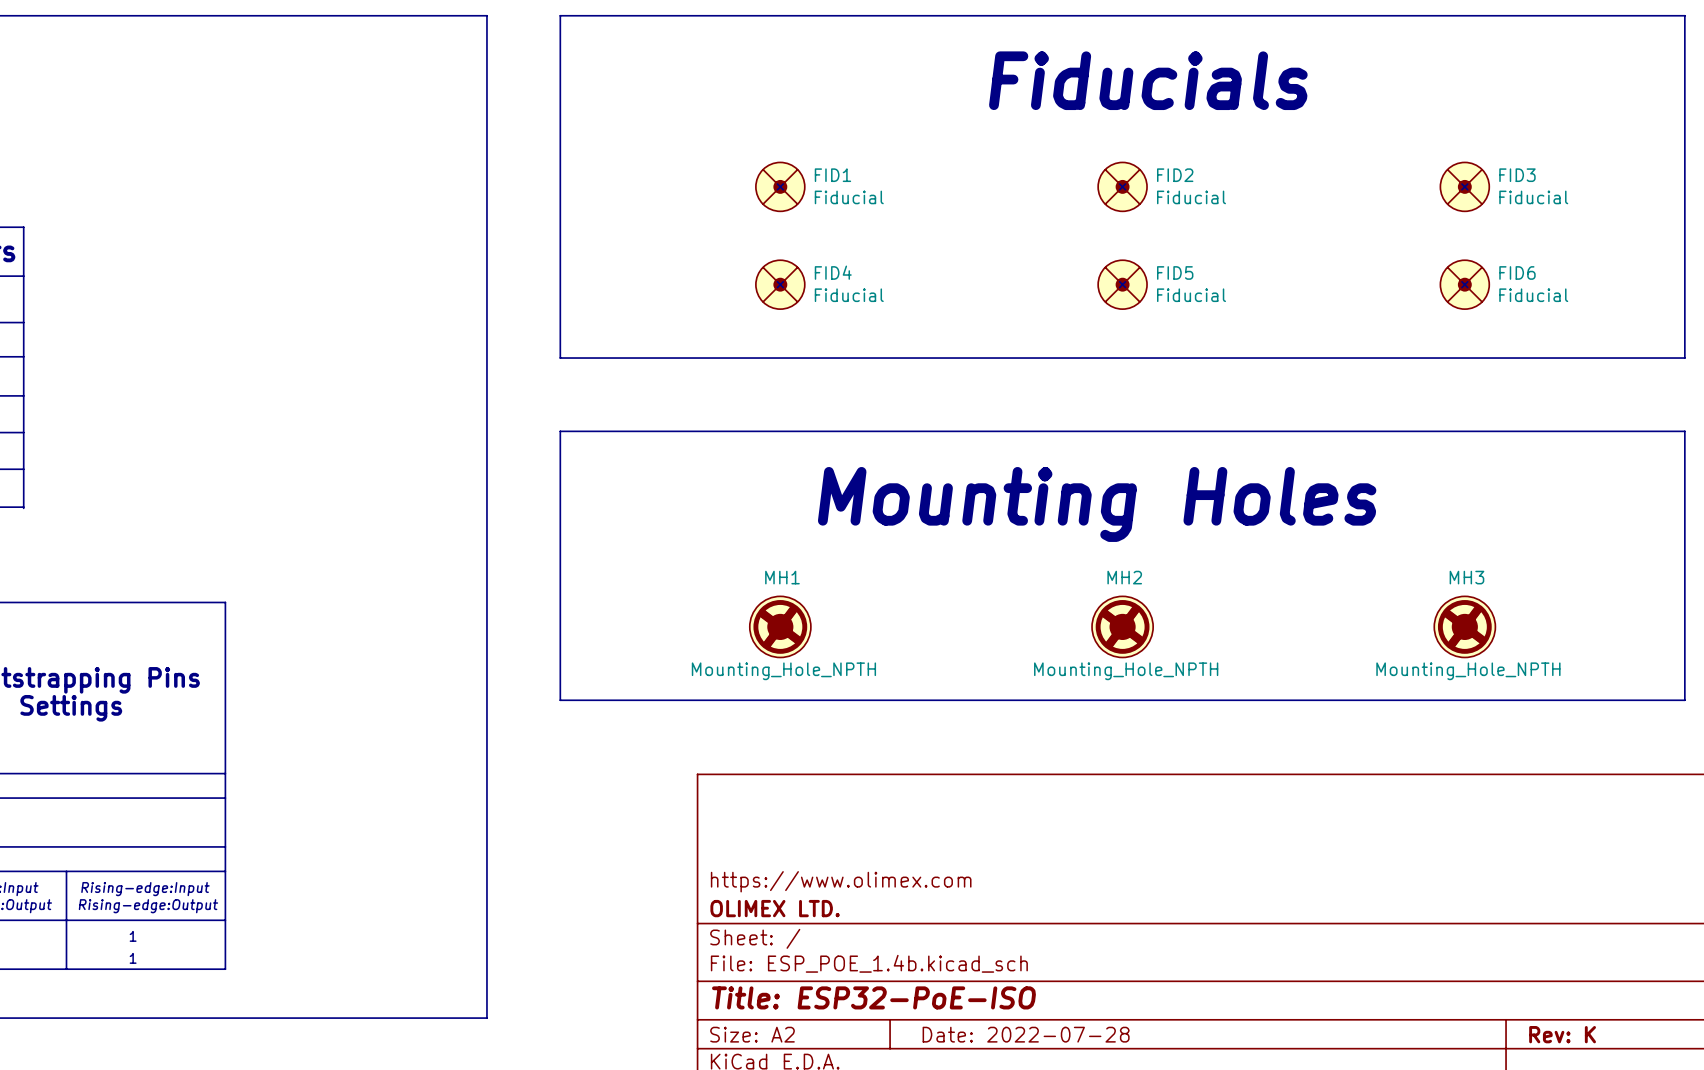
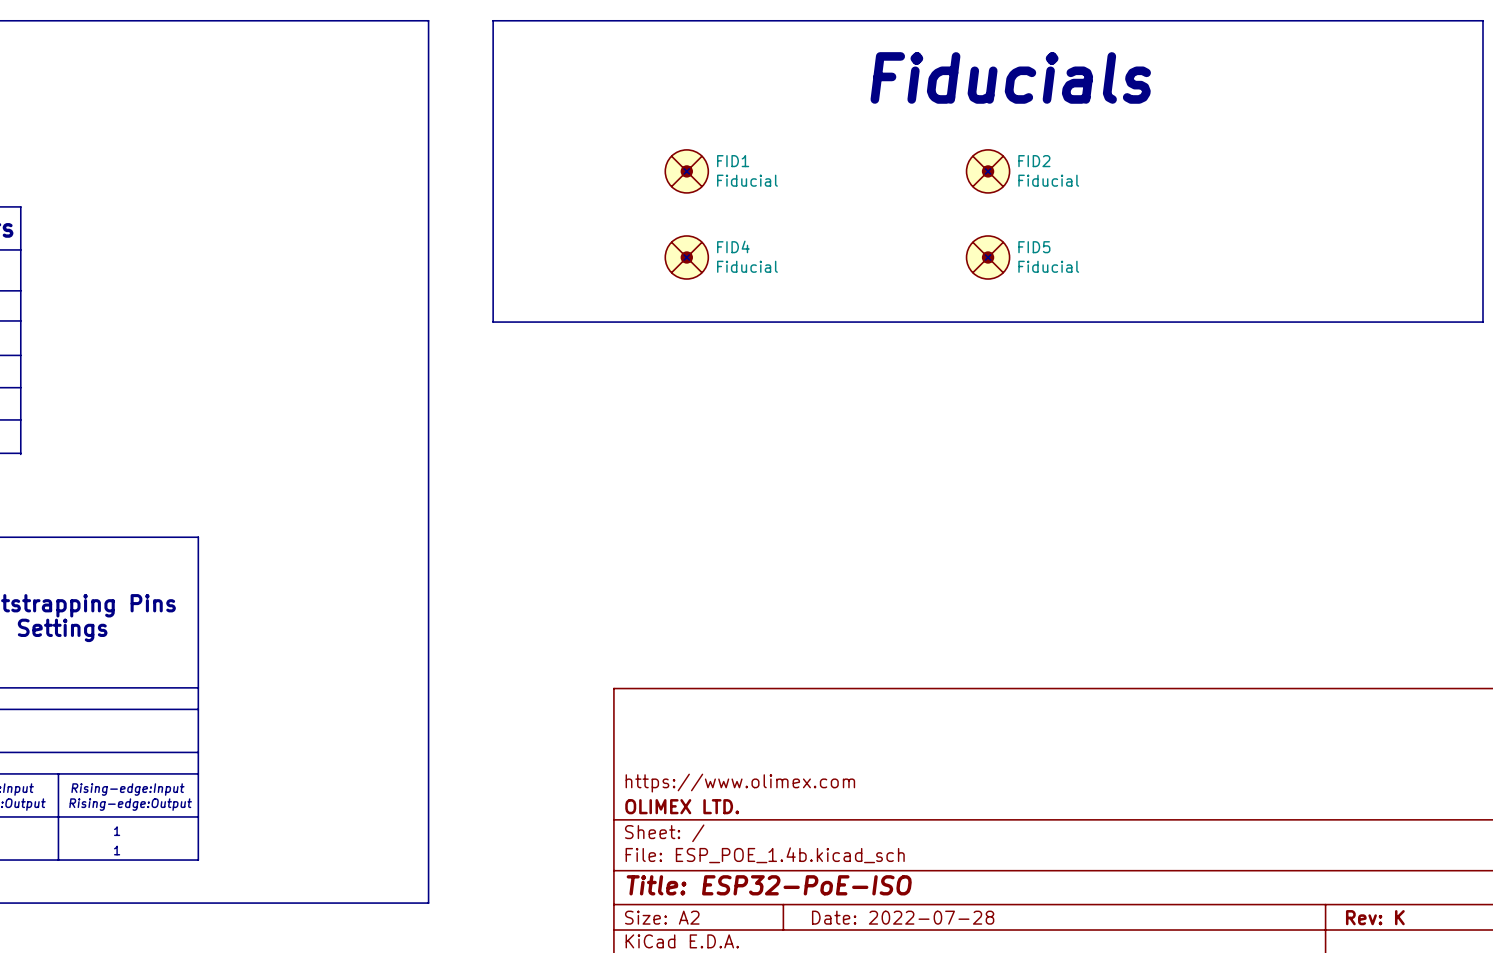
FID3: Fiducial (1464, 186) -> none
FID6: Fiducial (1464, 284) -> none
line: (560, 431) (1684, 431) (1684, 700) (560, 700) (560, 431) -> none
text: Mounting Holes (1097, 504) -> none
MH1: Mounting_Hole_NPTH (780, 626) -> none
MH2: Mounting_Hole_NPTH (1122, 626) -> none
MH3: Mounting_Hole_NPTH (1464, 626) -> none

